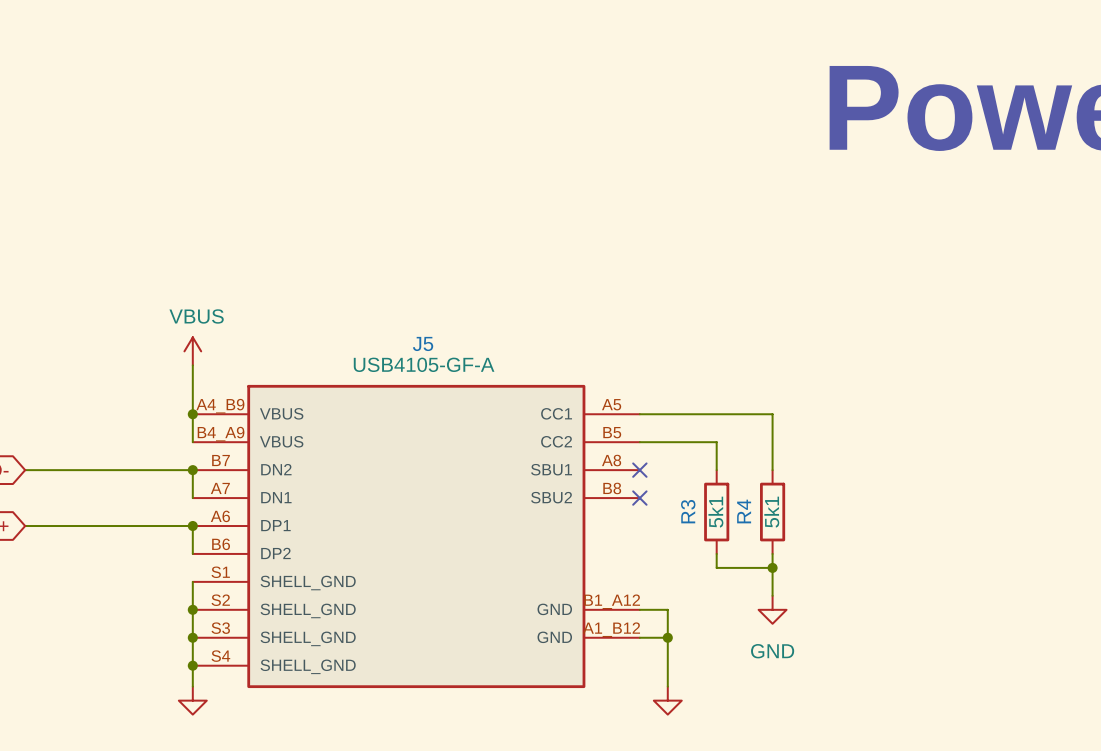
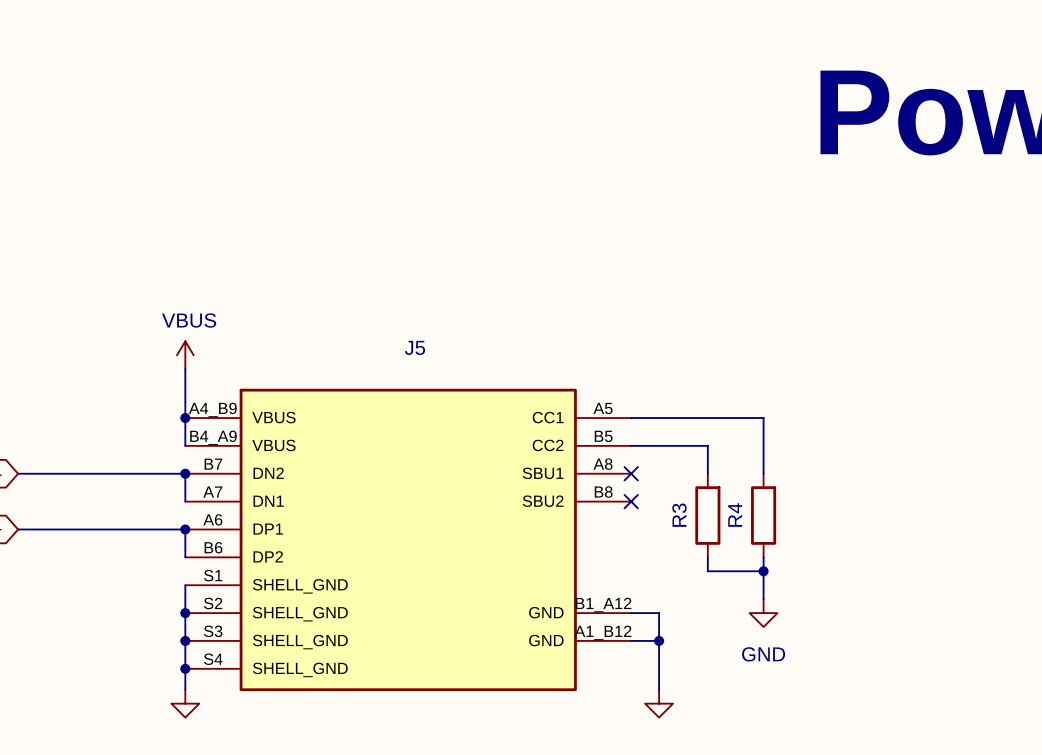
J5 value: USB4105-GF-A (424, 364) -> none
R3 value: 5k1 (715, 512) -> none
R4 value: 5k1 (771, 512) -> none

